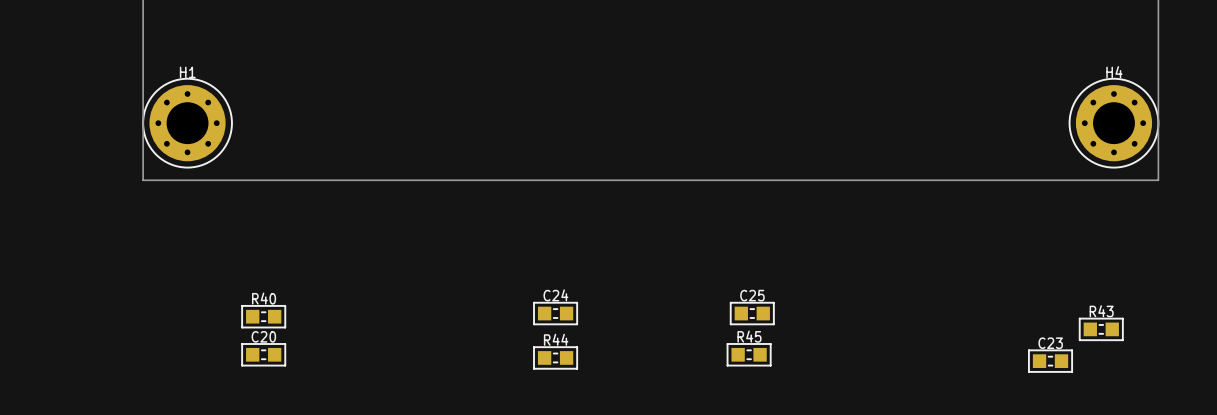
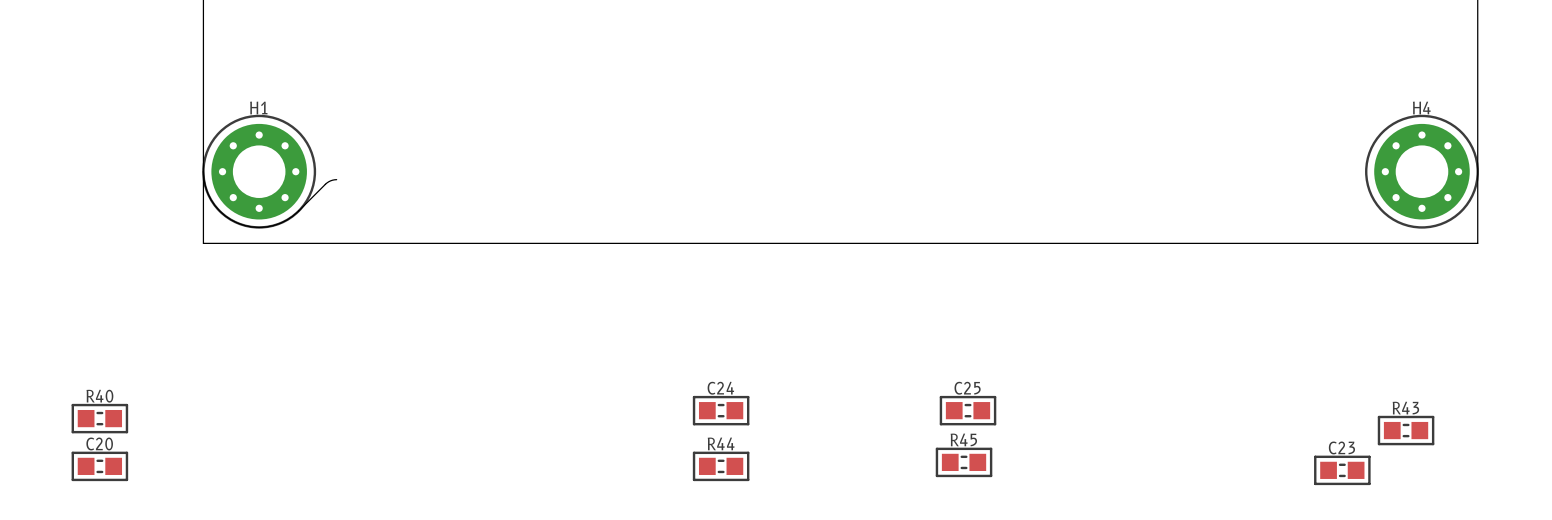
board edge: none -> (203, 171) (207, 193) (219, 211) (237, 223) (259, 227) (273, 225) (287, 219) (326, 182) (336, 179)
R40 position: (263, 316) -> (99, 418)
C20 position: (263, 354) -> (99, 466)

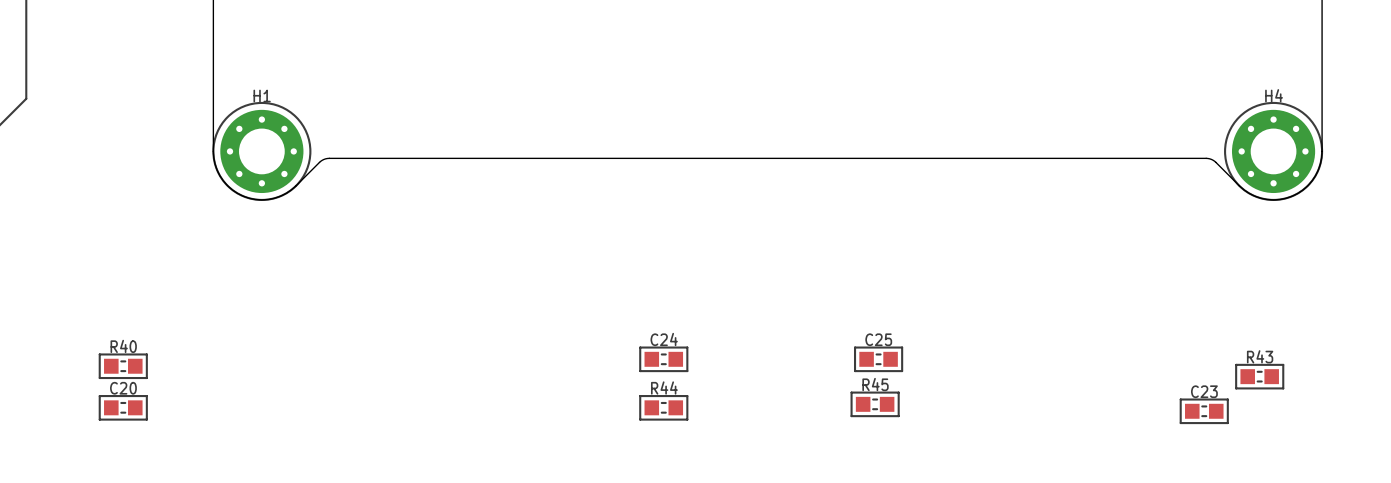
board edge: (203, 171) (203, 243) (1477, 243) (1477, 171) -> (329, 158) (1206, 158) (1214, 161) (1249, 193) (1261, 198) (1273, 199) (1292, 196) (1307, 185) (1318, 170) (1322, 151)

